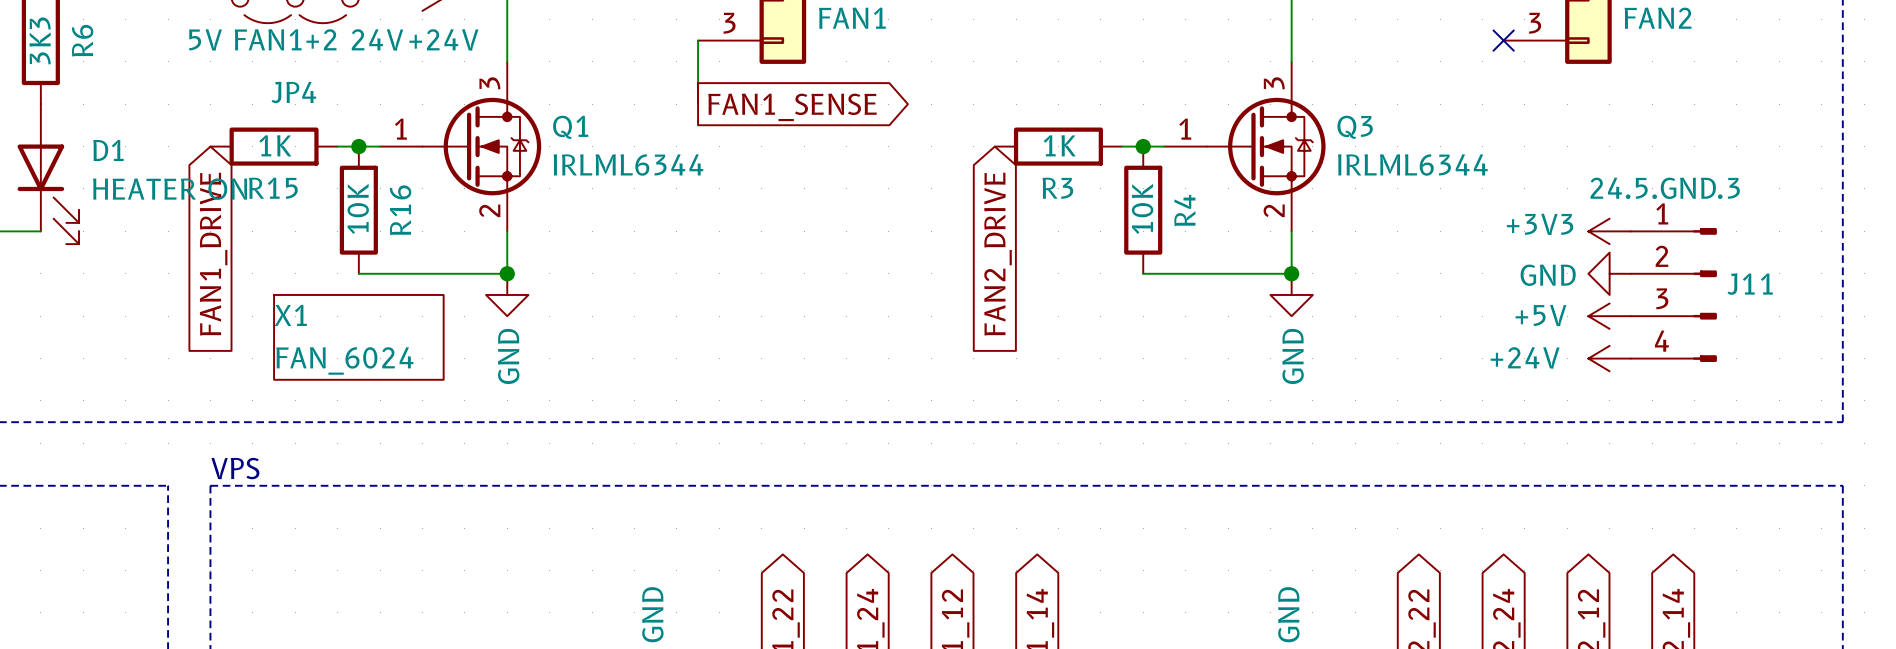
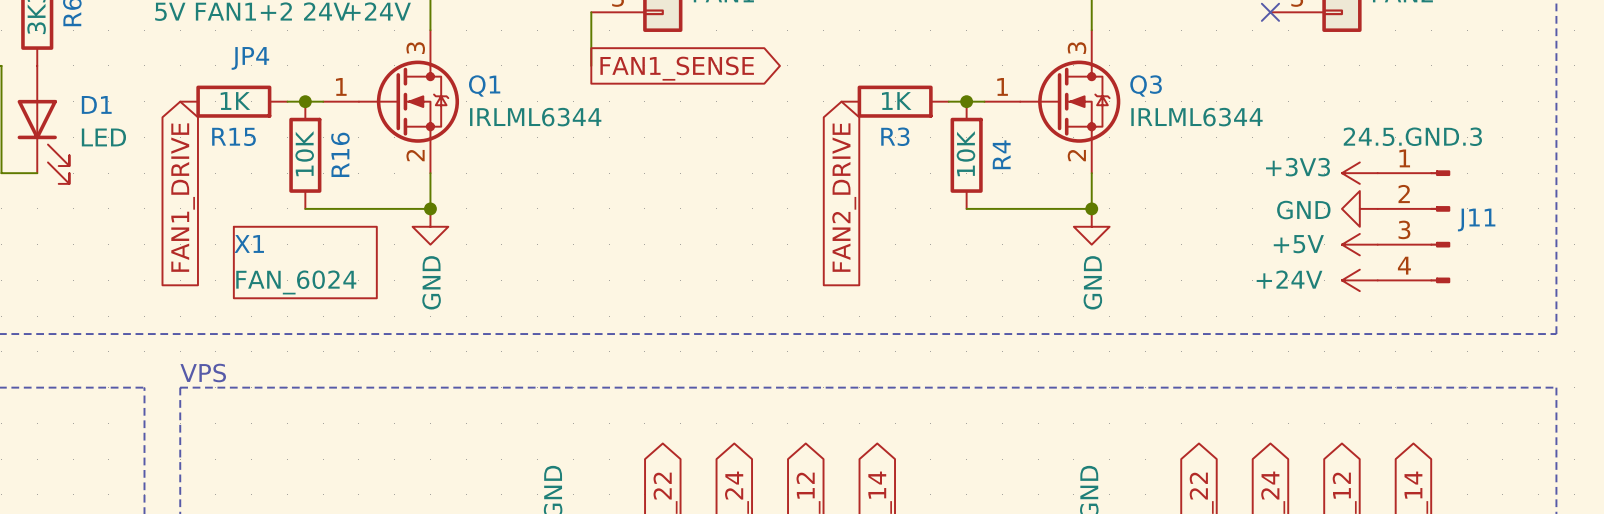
D1 value: HEATER ON (170, 189) -> LED (103, 137)

